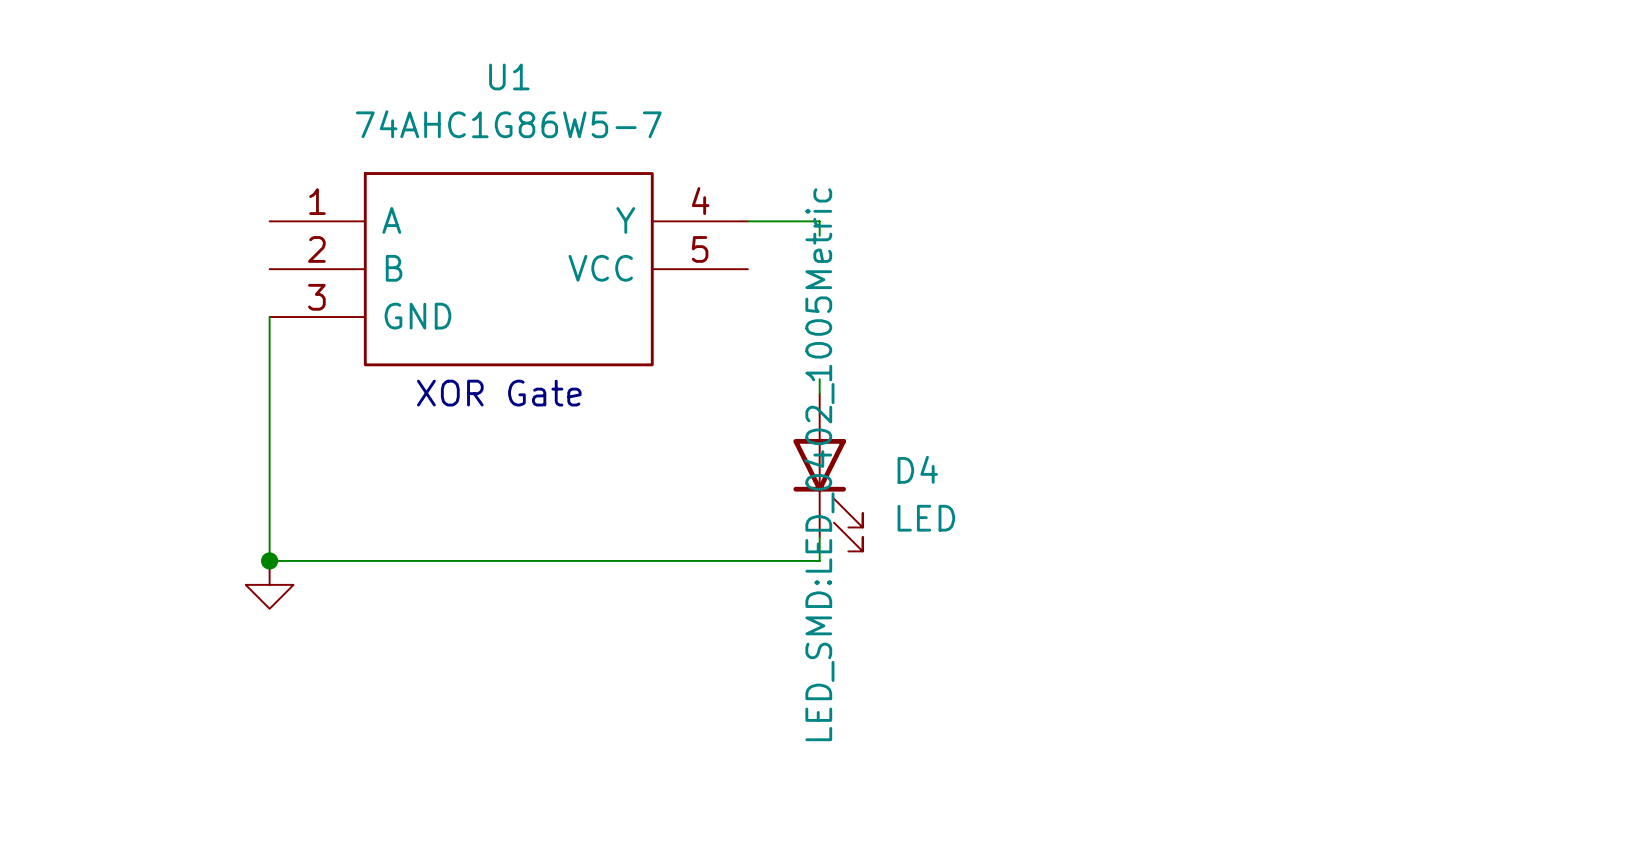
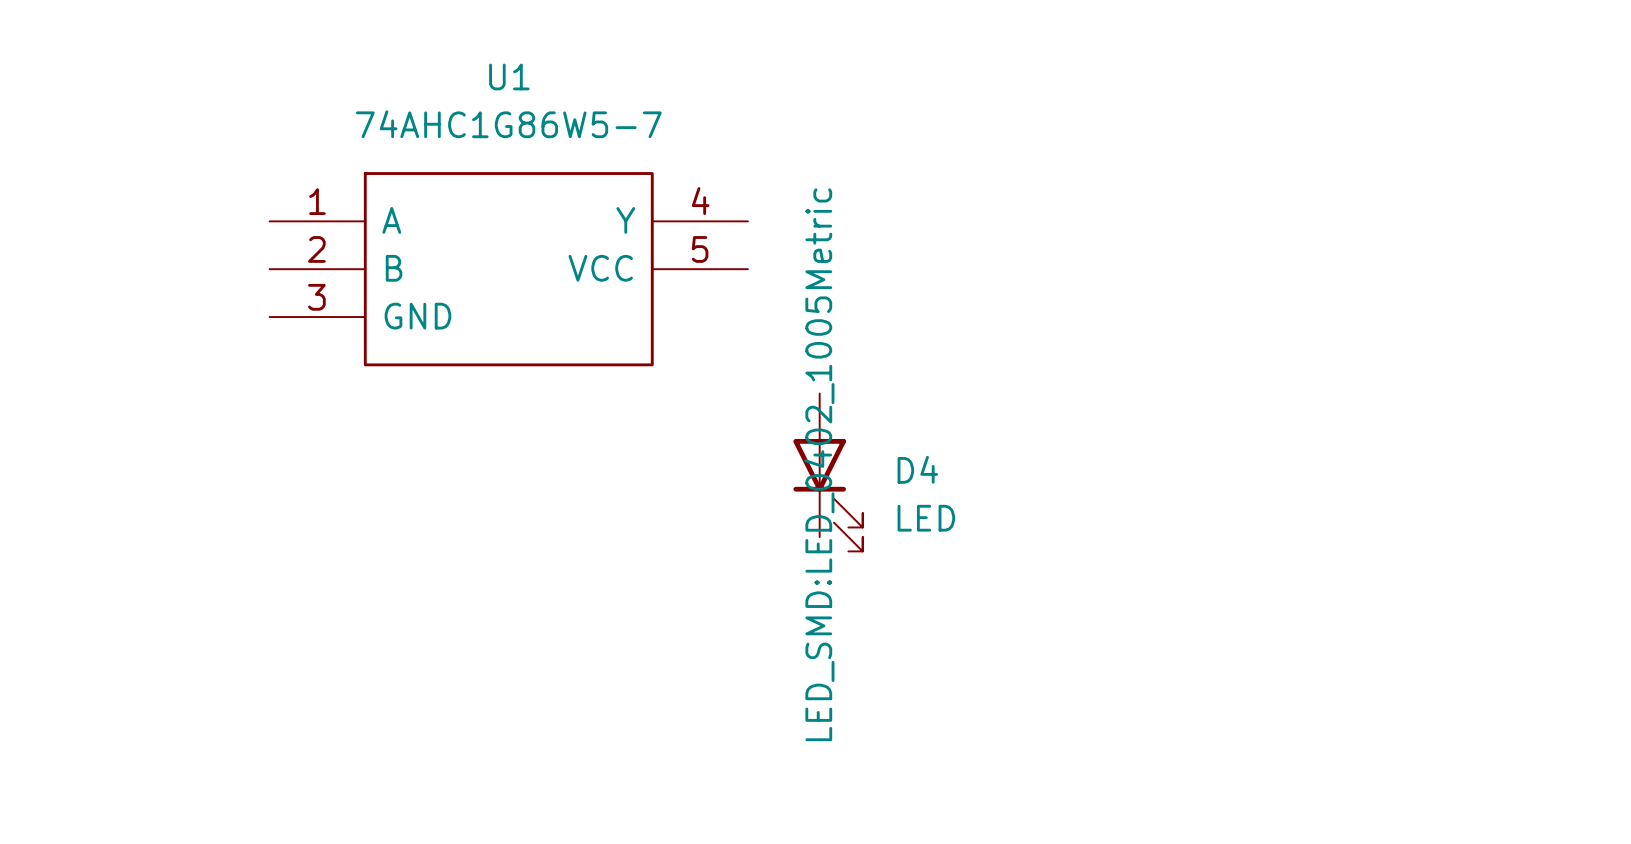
wire: (747, 221) (819, 221) (819, 235) -> none
wire: (269, 317) (269, 560) (819, 560) (819, 537) -> none
wire: (819, 379) (819, 393) -> none
text: XOR Gate (499, 393) -> none
junction: (269, 560) -> none
power symbol: (269, 584) -> none

